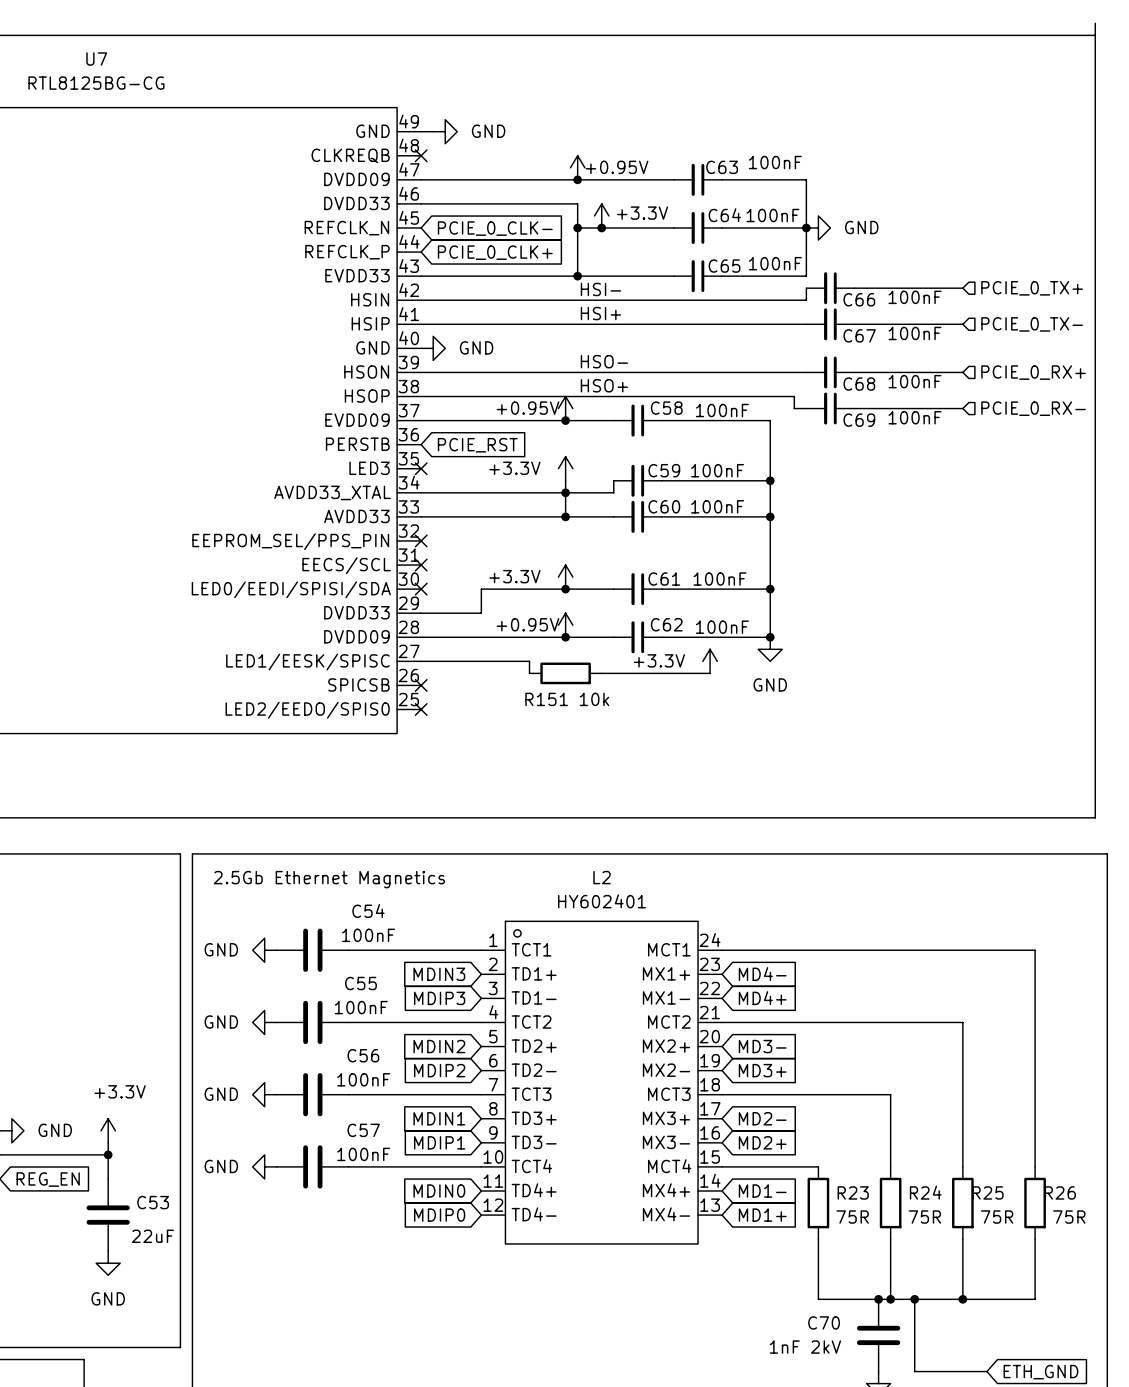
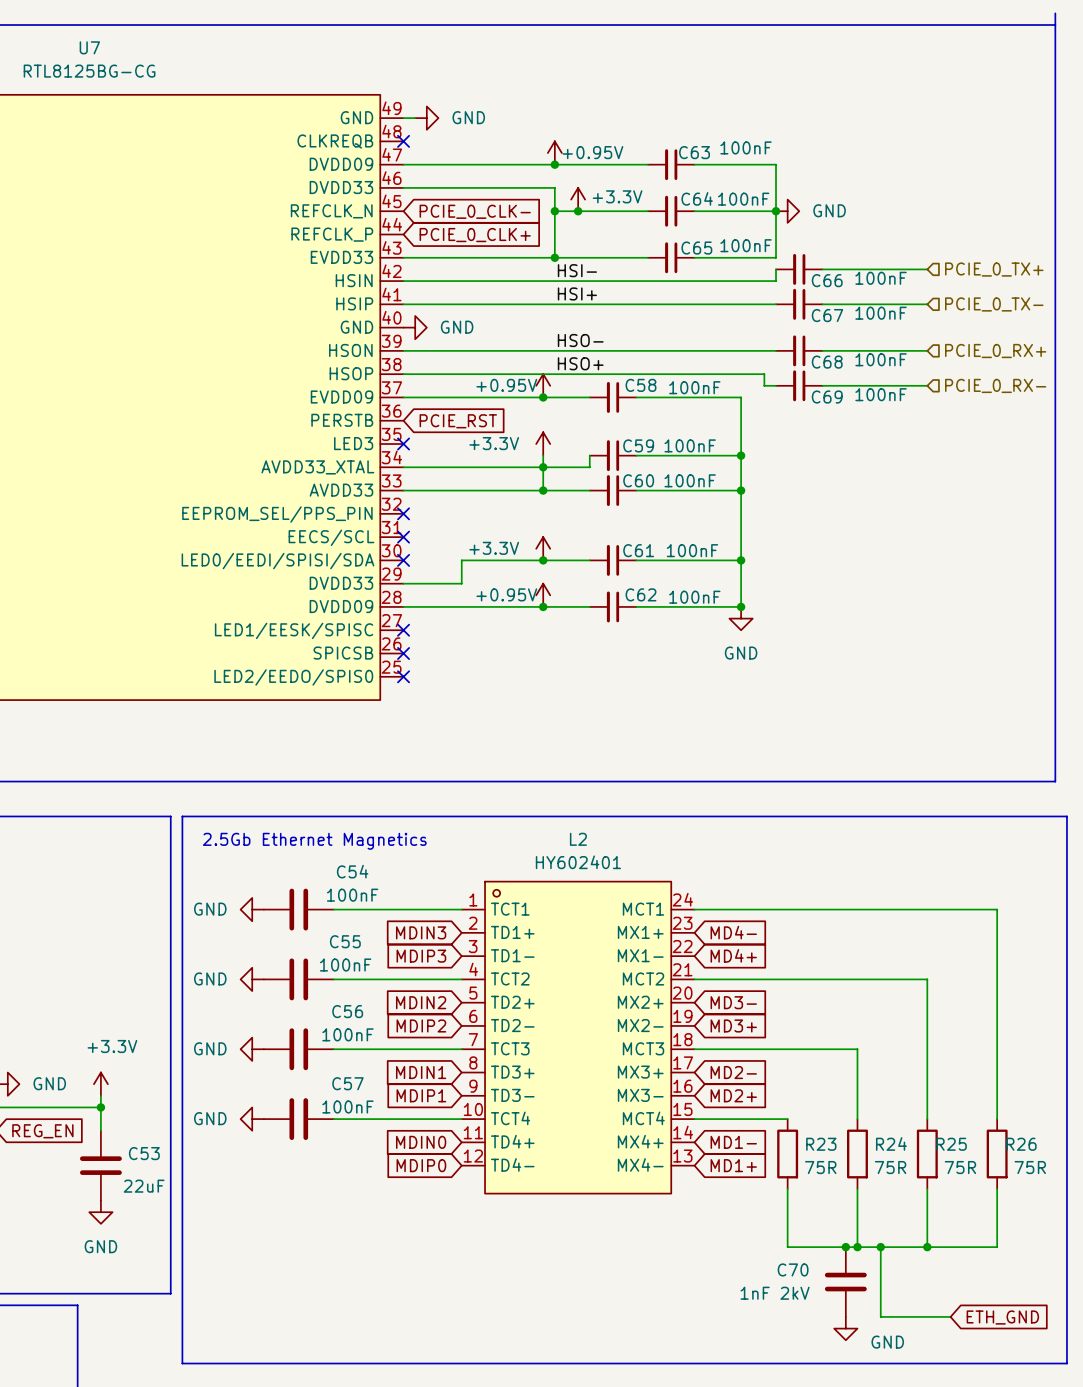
wire: (421, 661) (529, 661) (529, 673) -> none
no-connect mark: none -> (403, 630)
power symbol: +3.3V (710, 661) -> none
R151: 10k (565, 673) -> none
wire: (601, 673) (710, 673) -> none

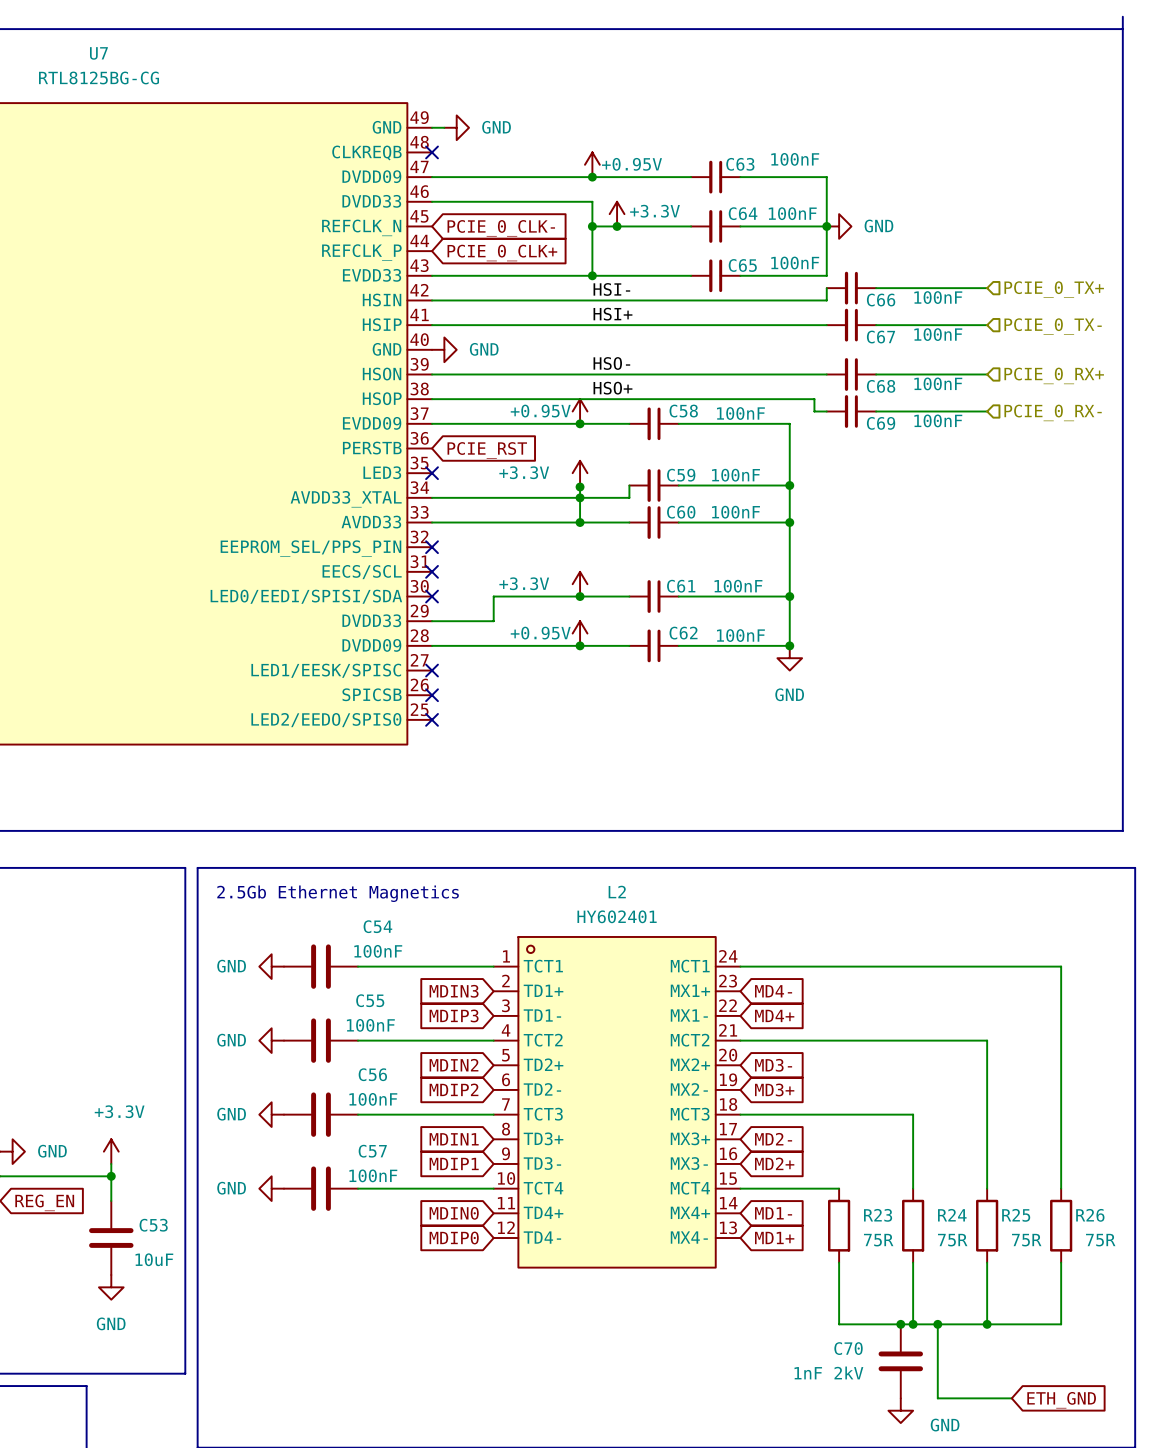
junction: none -> (580, 487)
C53 value: 22uF (144, 1186) -> 10uF (154, 1259)

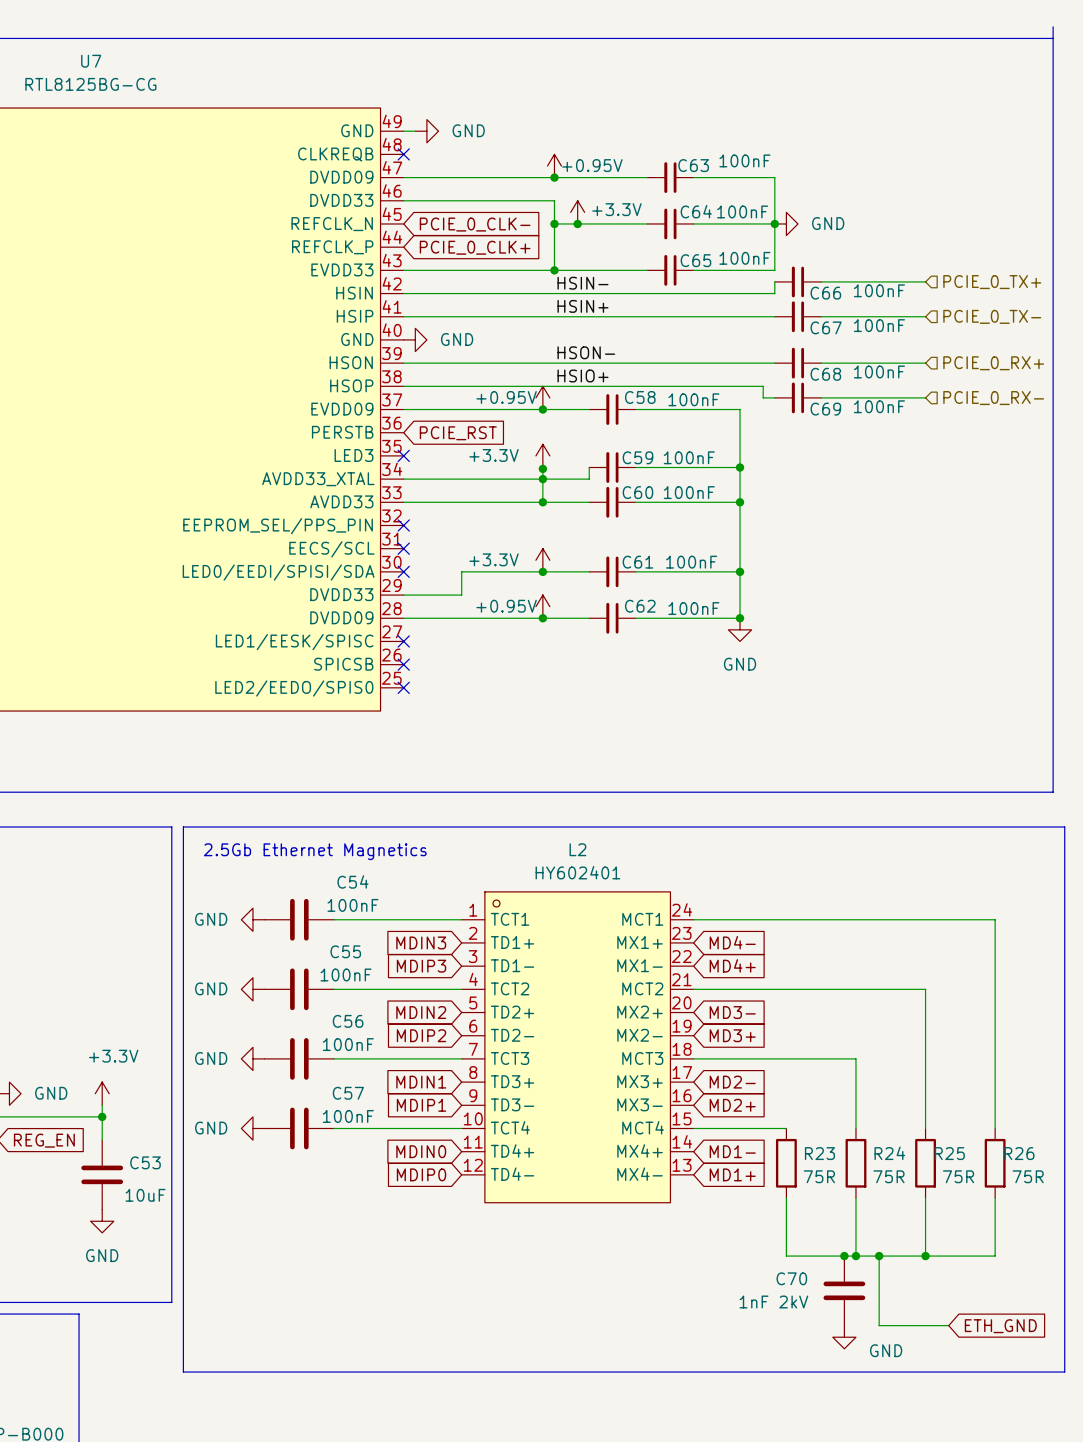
label: HSI- (611, 289) -> HSIN- (583, 283)
label: HSI+ (612, 314) -> HSIN+ (583, 306)
label: HSO- (611, 363) -> HSON- (586, 352)
label: HSO+ (612, 388) -> HSIO+ (583, 375)

